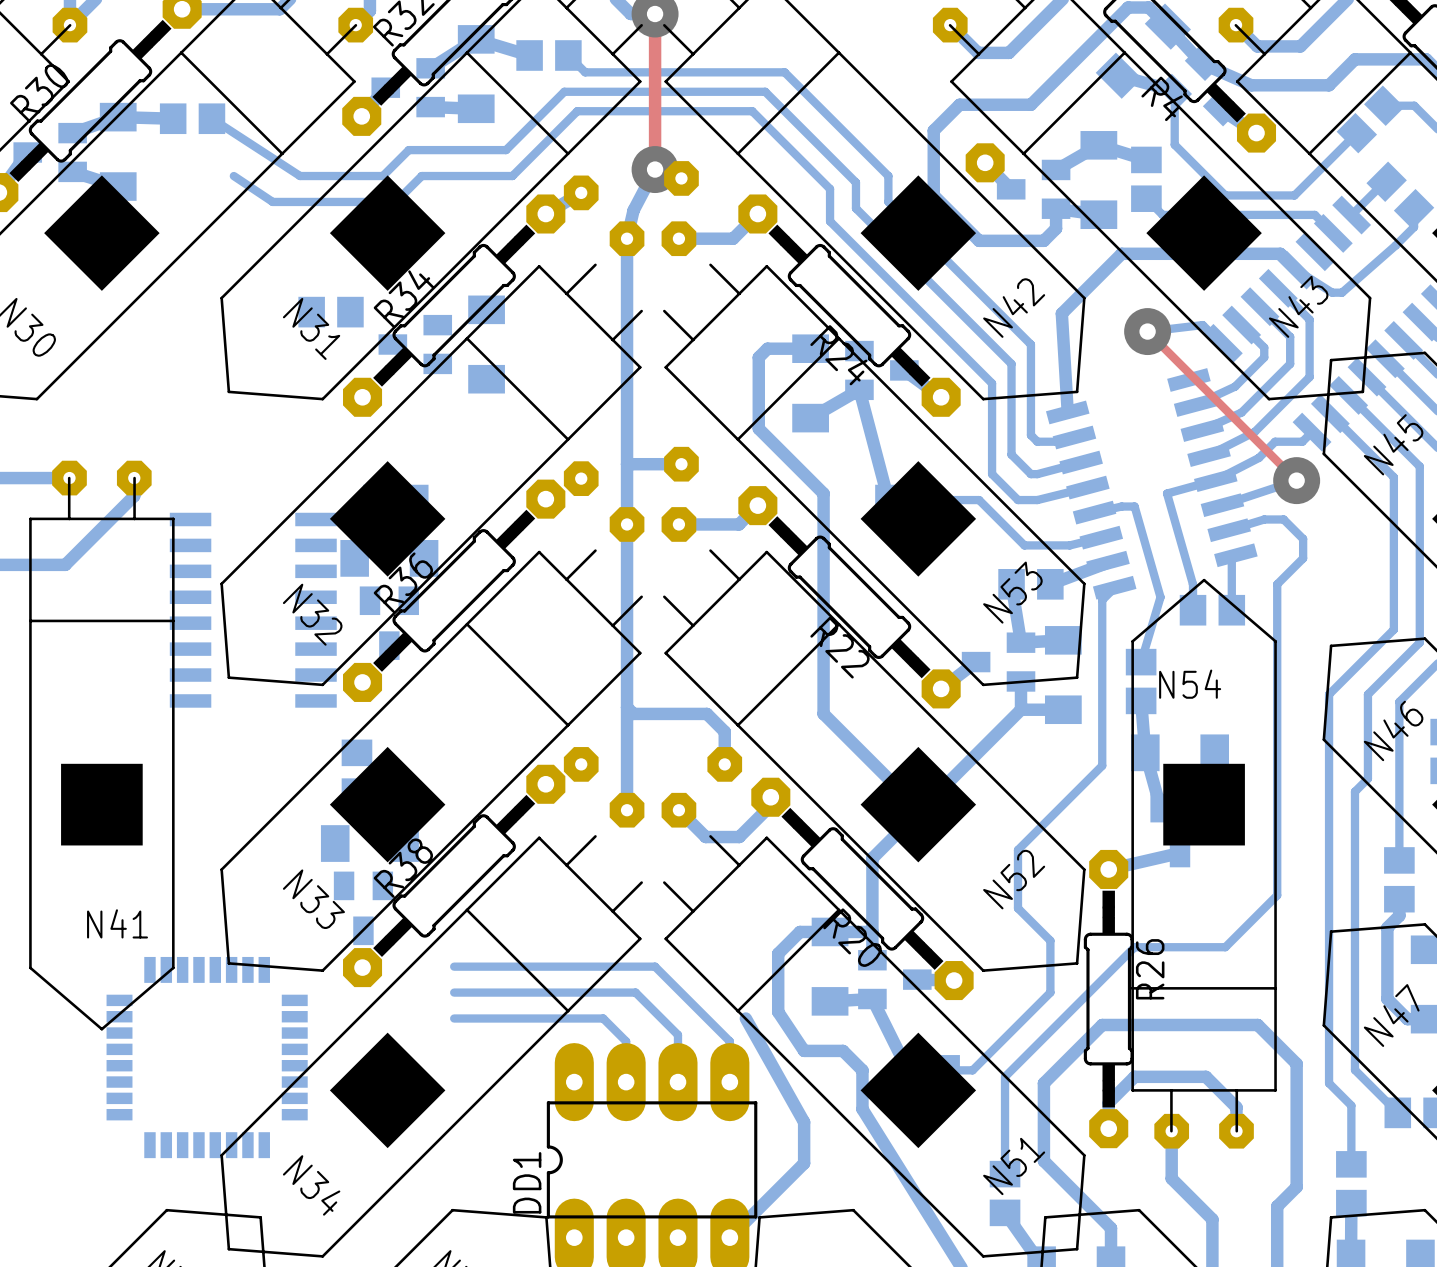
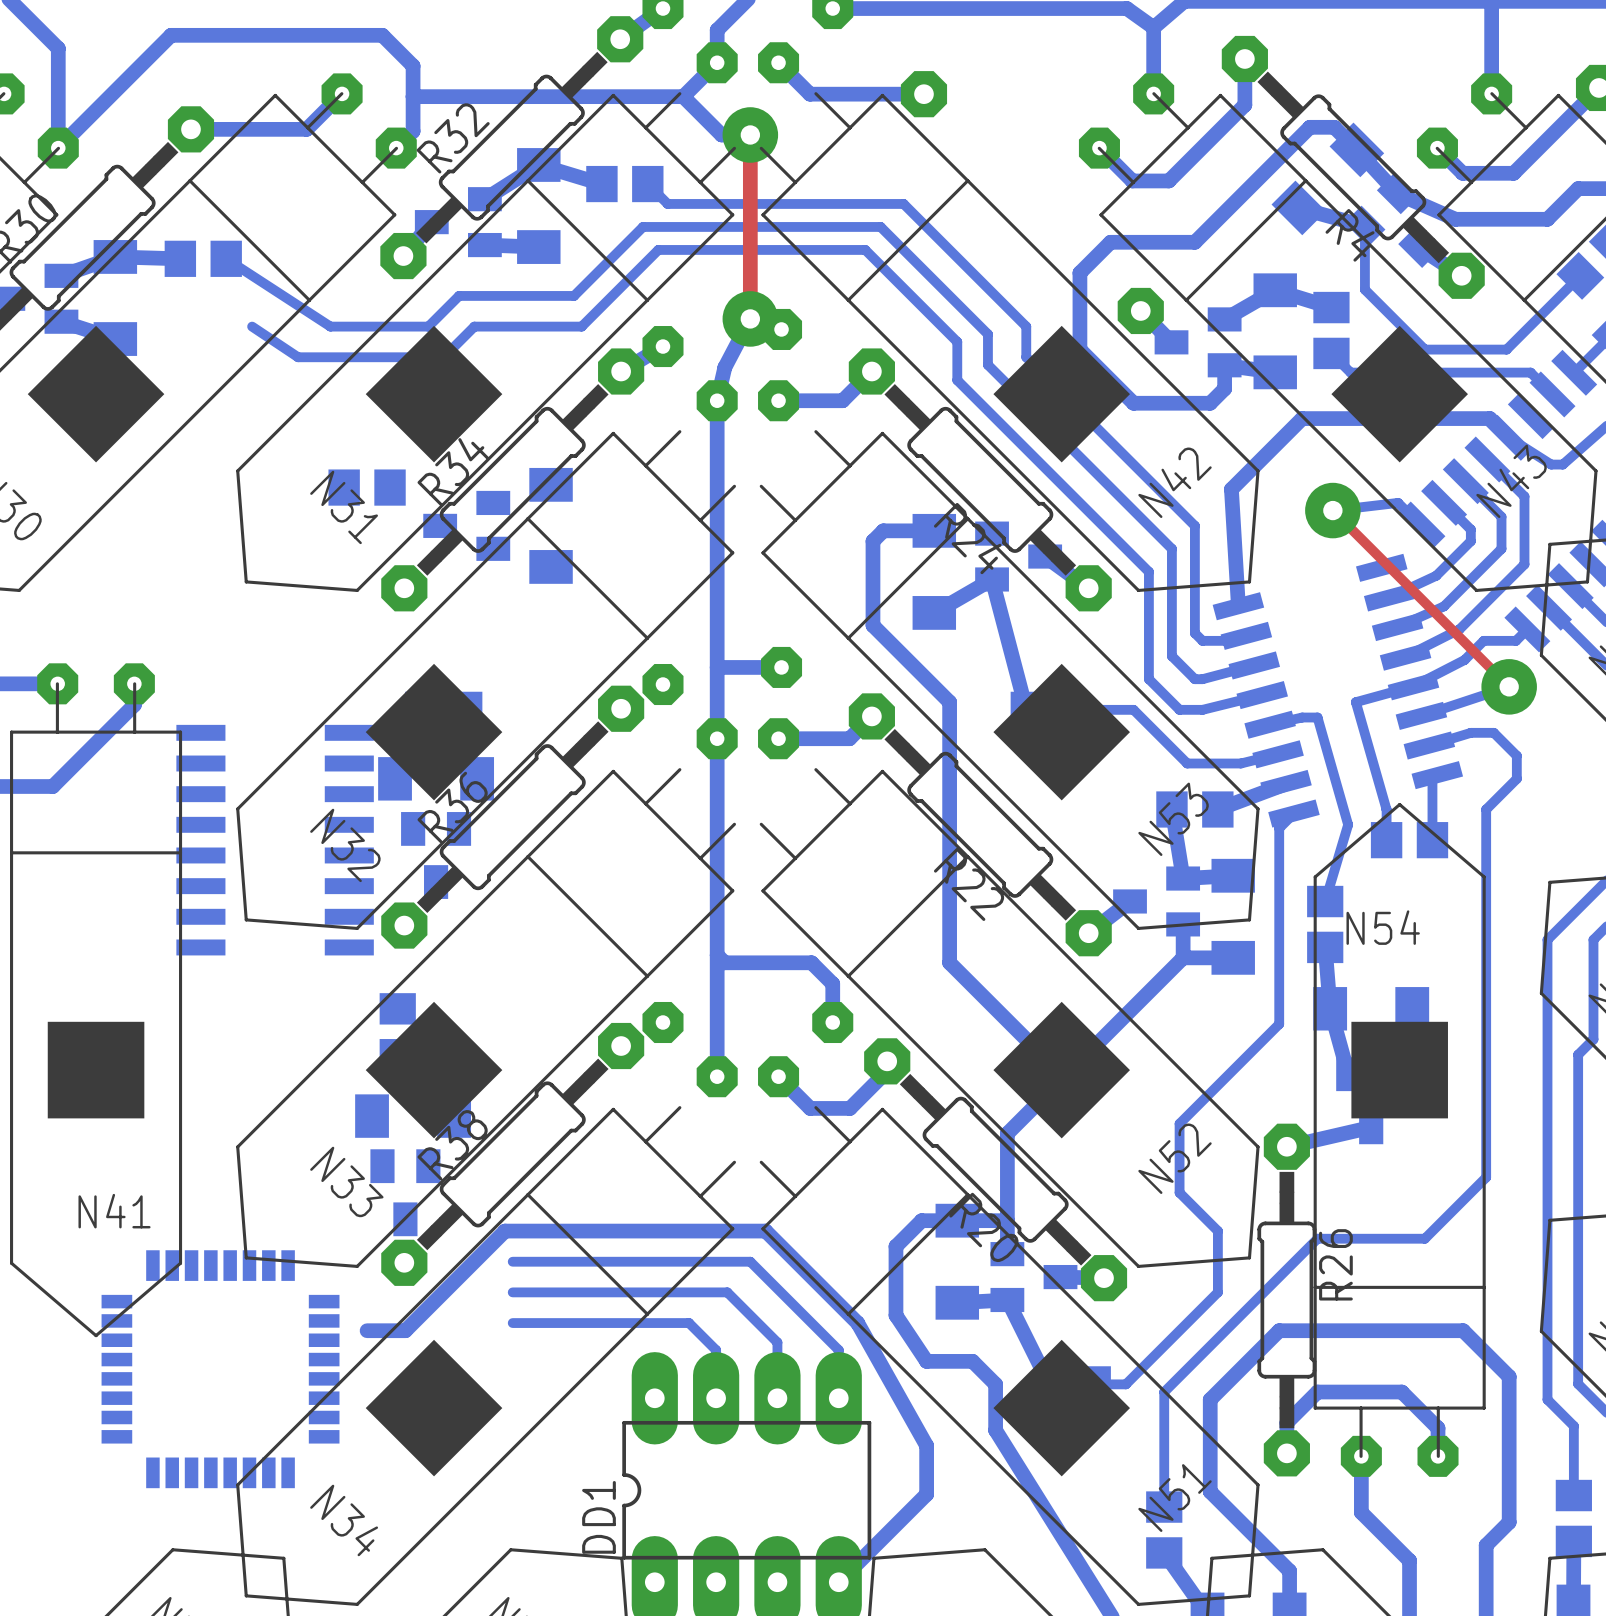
bottom track: none -> (857, 1323) (765, 1231) (505, 1231) (405, 1330) (367, 1330)

